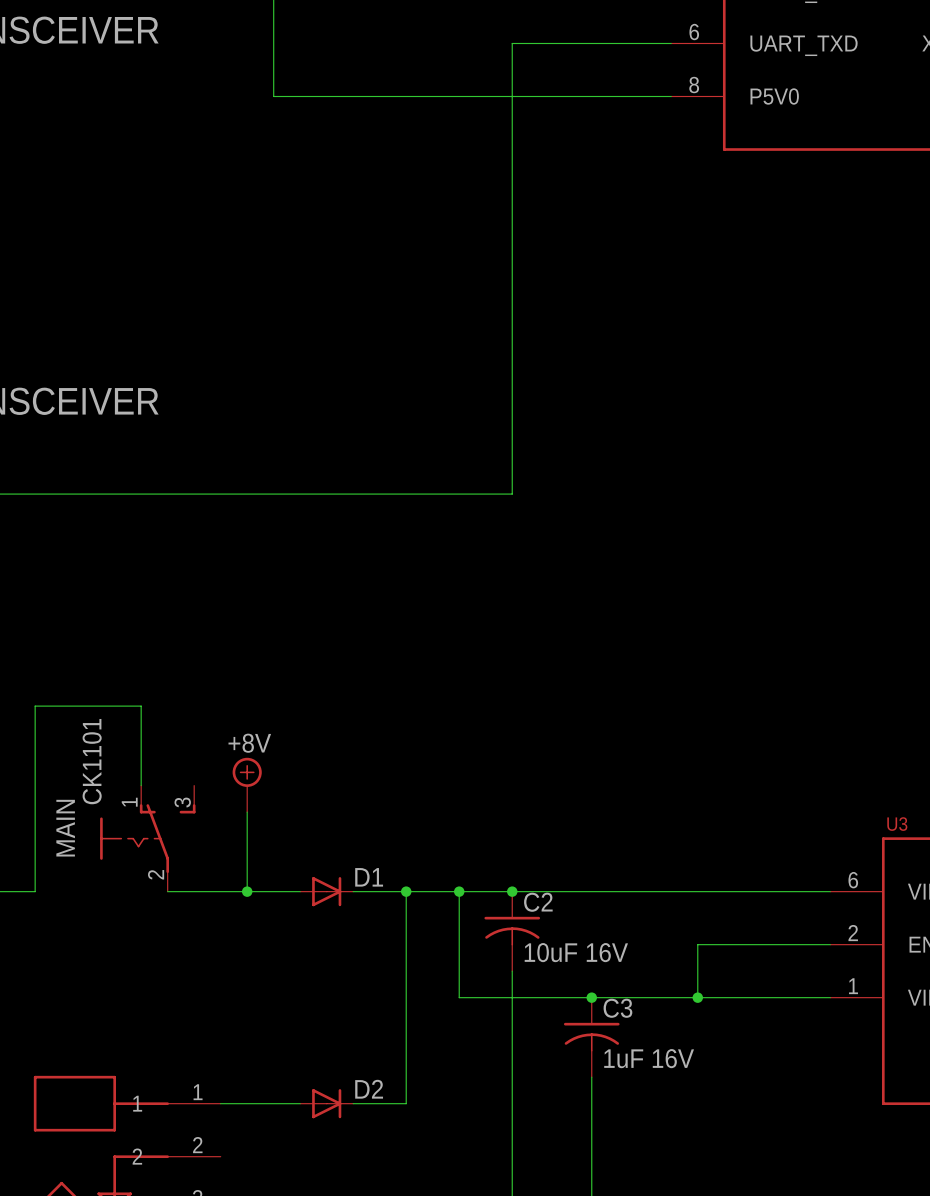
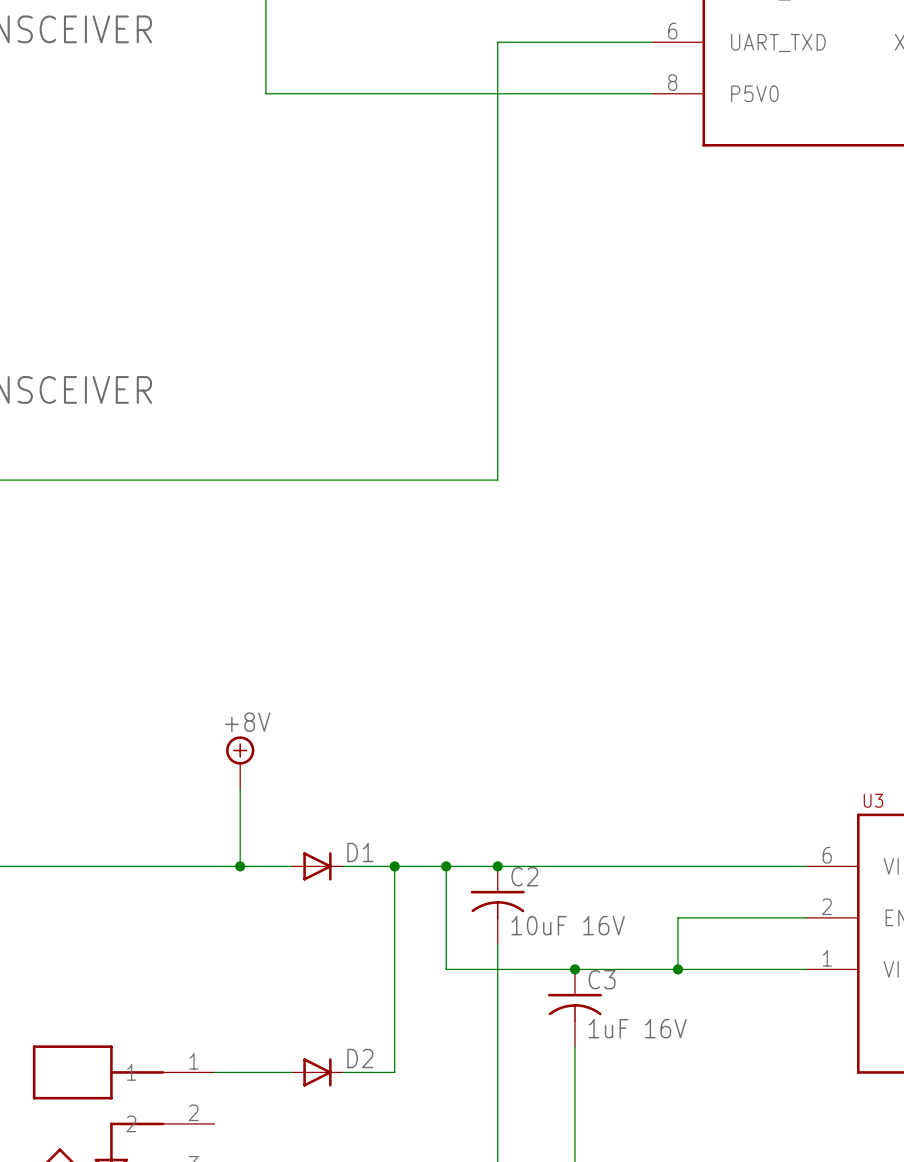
wire: (141, 785) (141, 706) (35, 706) (35, 891) -> (162, 866) (34, 866)
MAIN: CK1101 (147, 838) -> none

